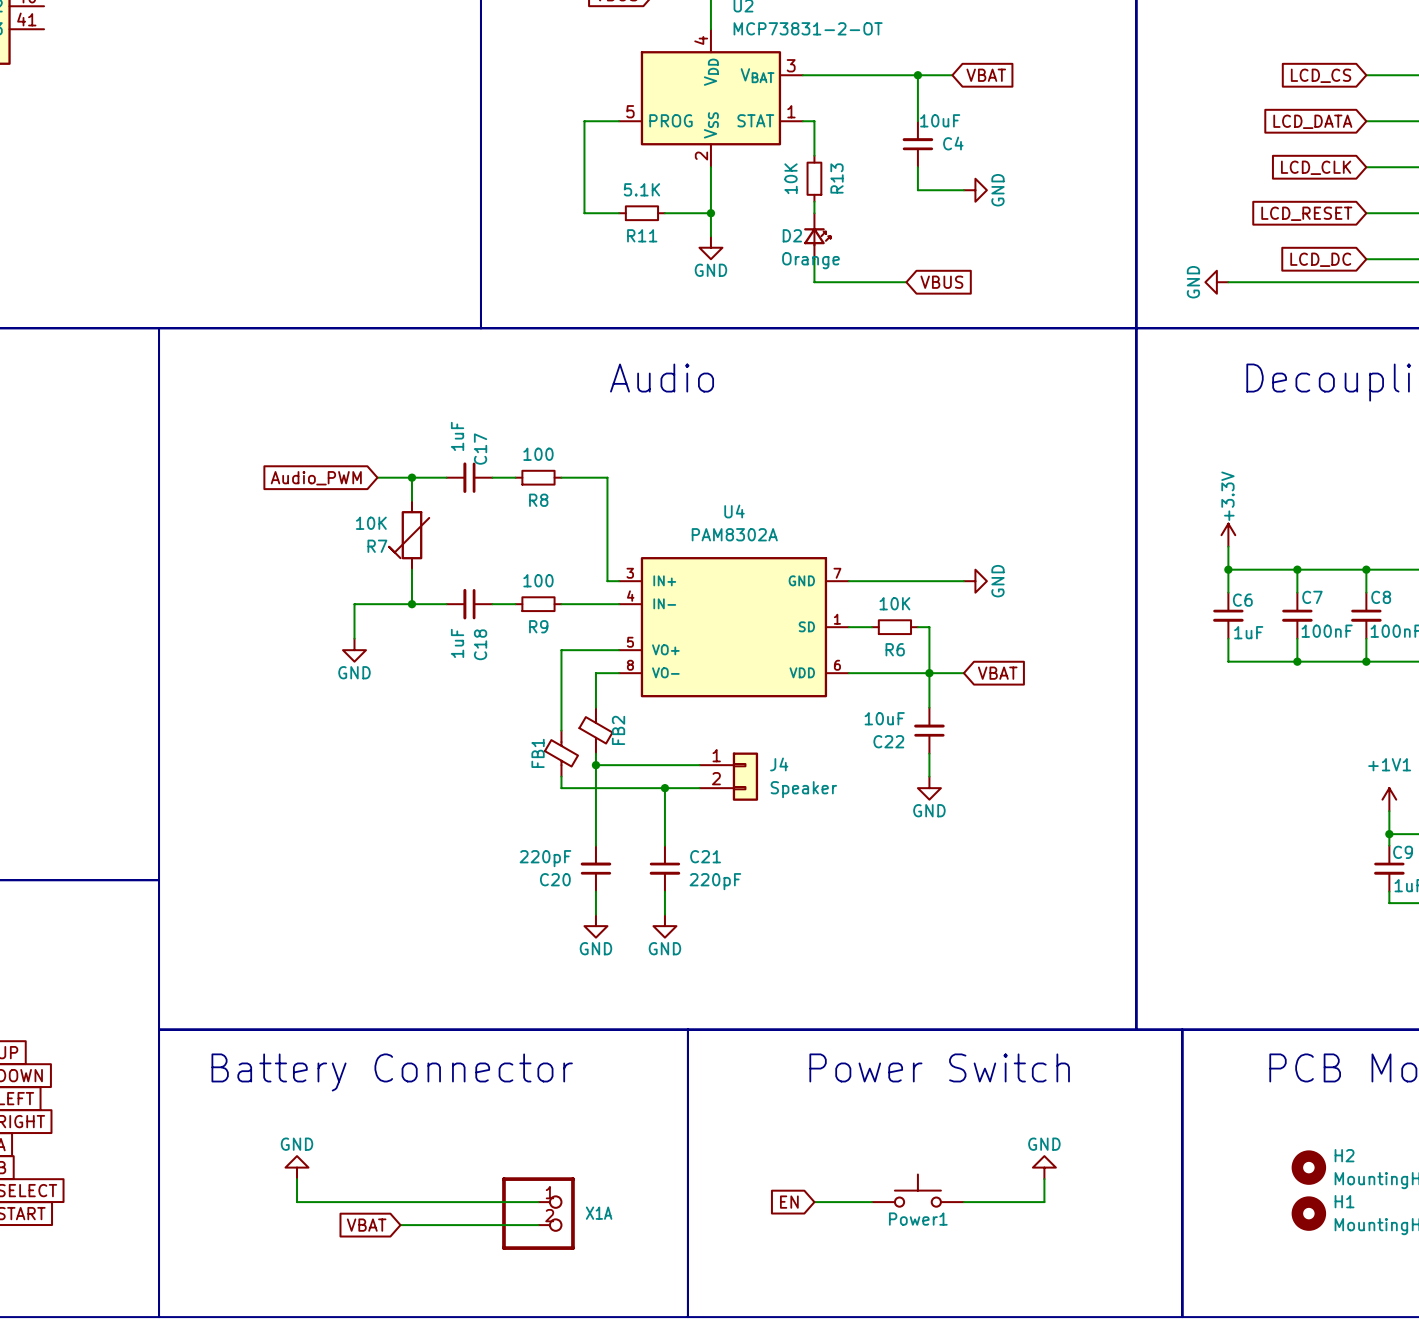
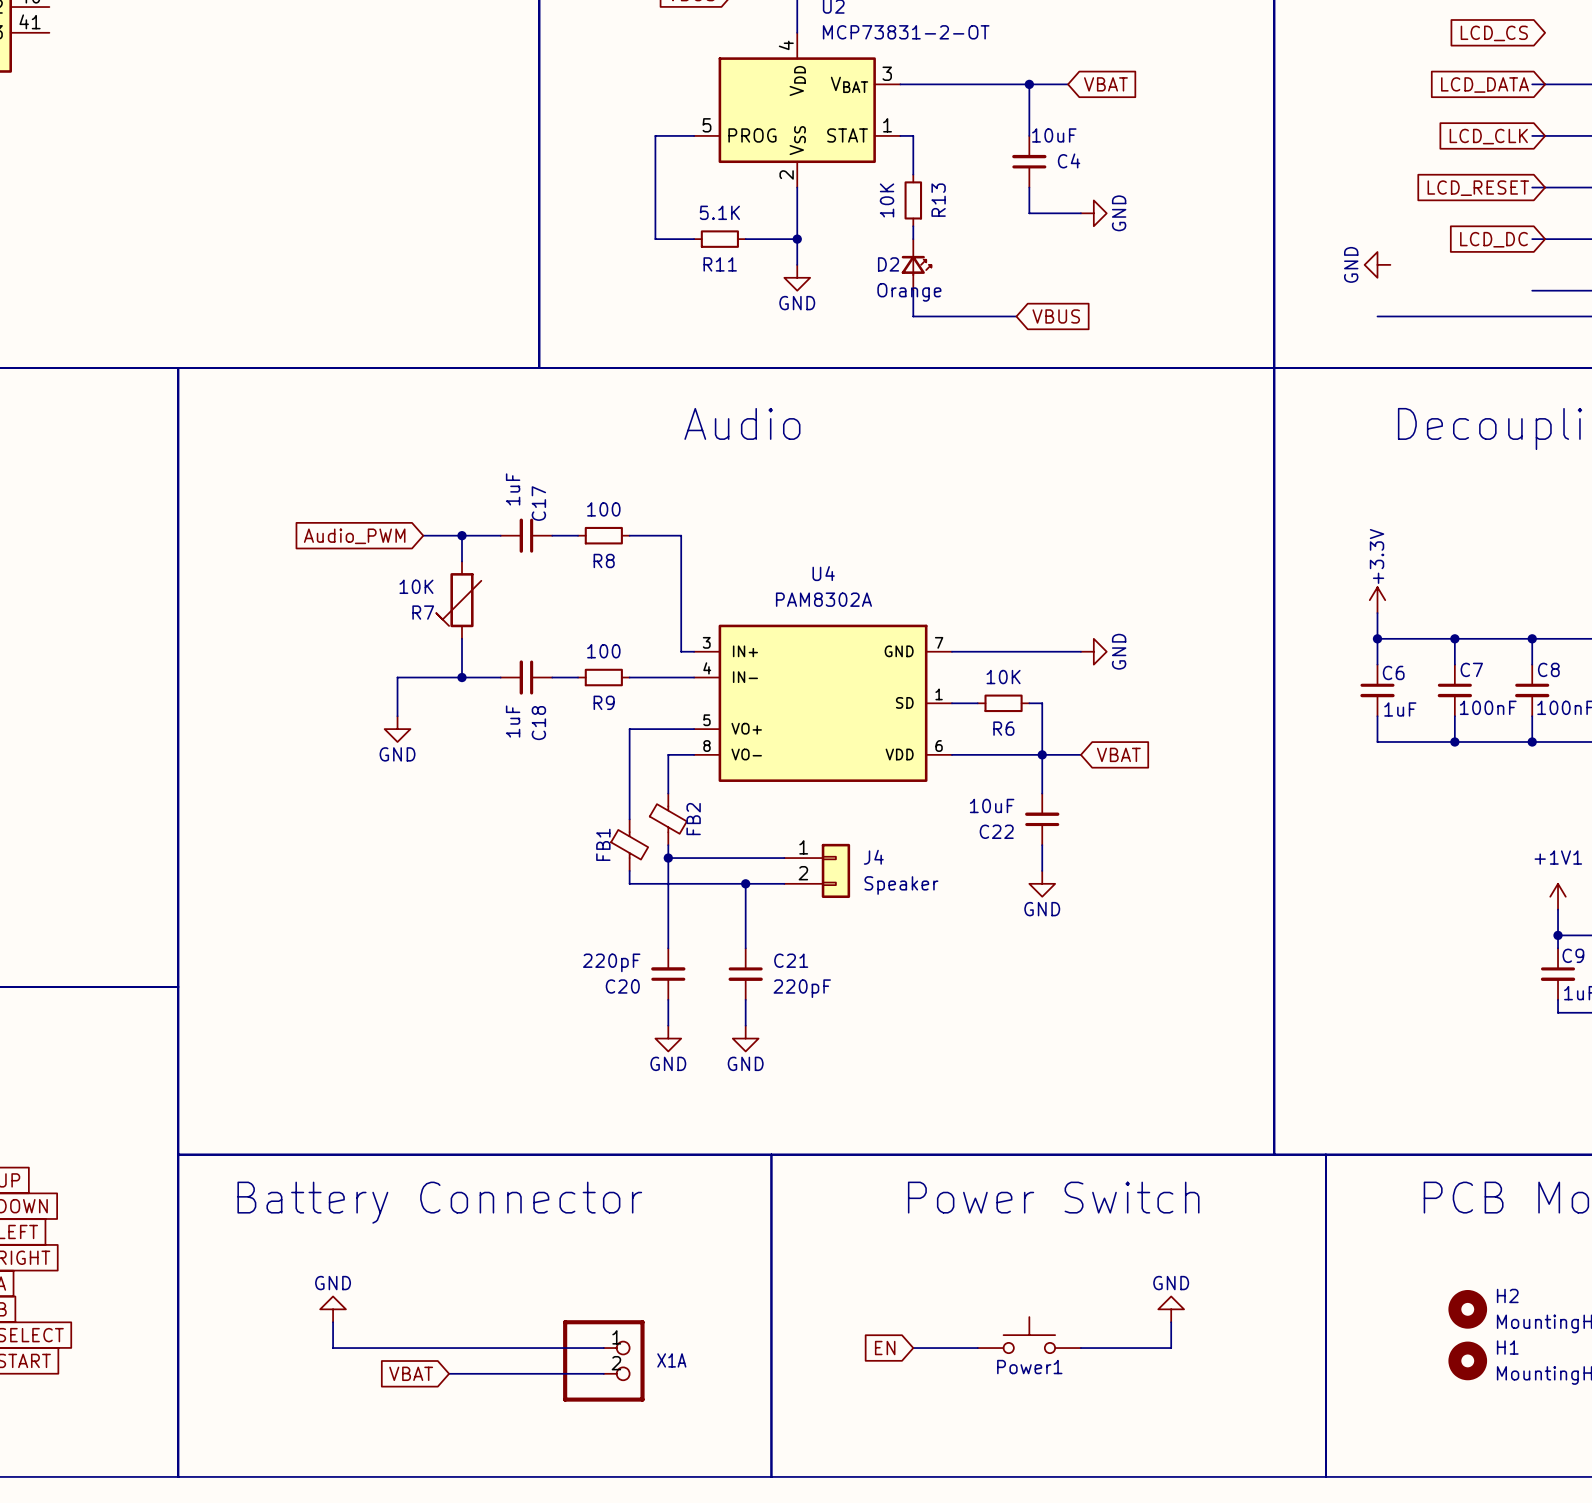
global label position: LCD_CS (1321, 75) -> LCD_CS (1494, 33)
global label position: LCD_DATA (1312, 121) -> LCD_DATA (1485, 84)
global label position: LCD_CLK (1316, 167) -> LCD_CLK (1488, 136)
global label position: LCD_RESET (1306, 213) -> LCD_RESET (1478, 188)
global label position: LCD_DC (1320, 259) -> LCD_DC (1493, 239)
power symbol position: GND (1216, 282) -> GND (1377, 264)

